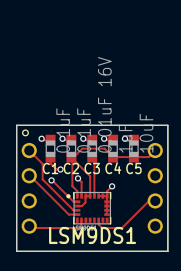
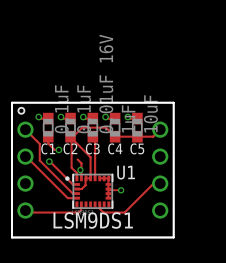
via: (78, 178) -> none
track: (112, 186) (107, 191) (107, 196) -> none
via: (112, 186) -> none
via: none -> (80, 170)
U1 name: none -> U1 (126, 172)
track: none -> (108, 190) (121, 190)
via: none -> (121, 190)

